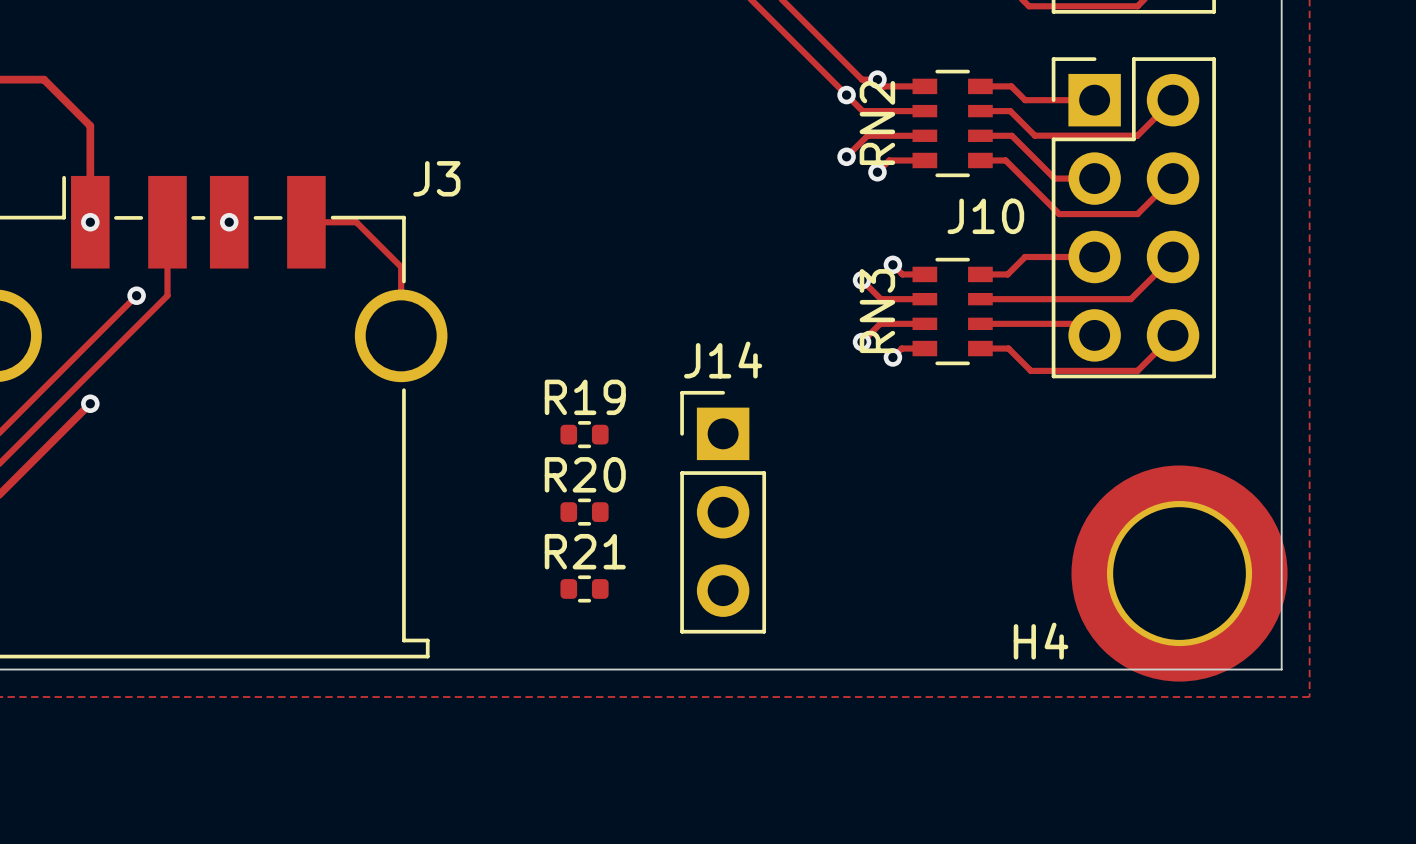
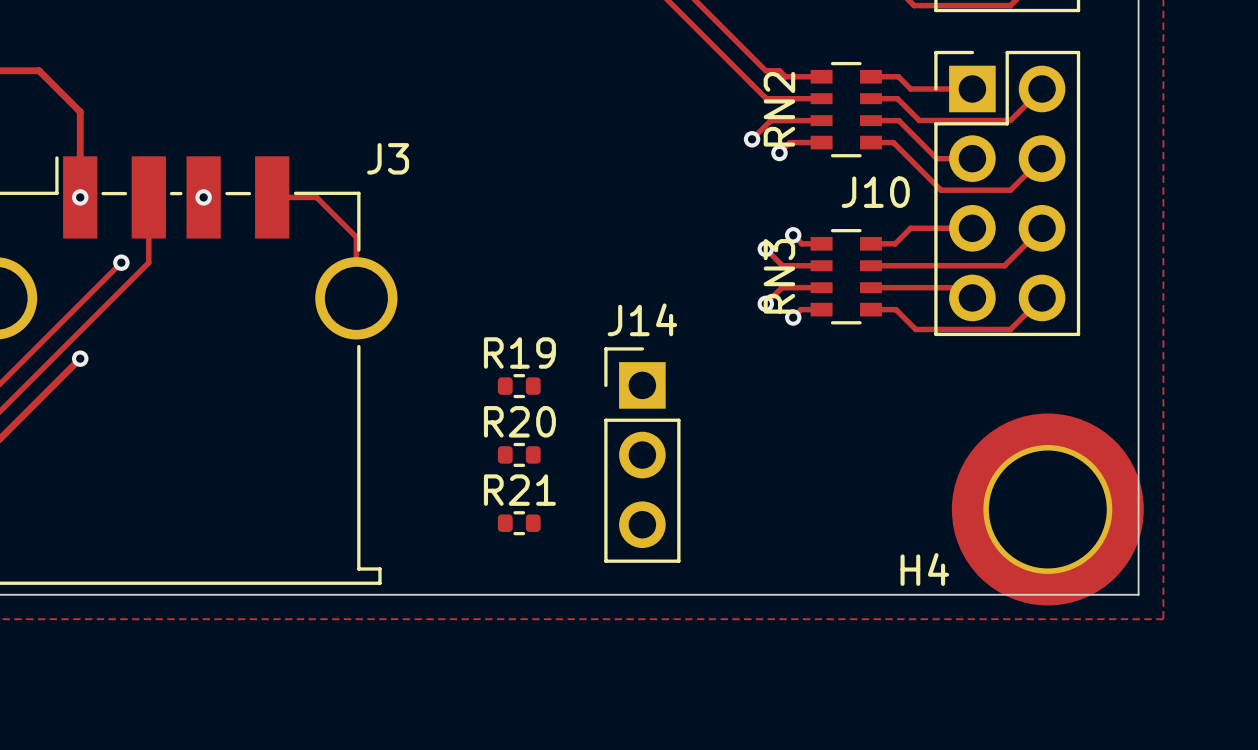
via: (877, 79) -> none
via: (846, 95) -> none

